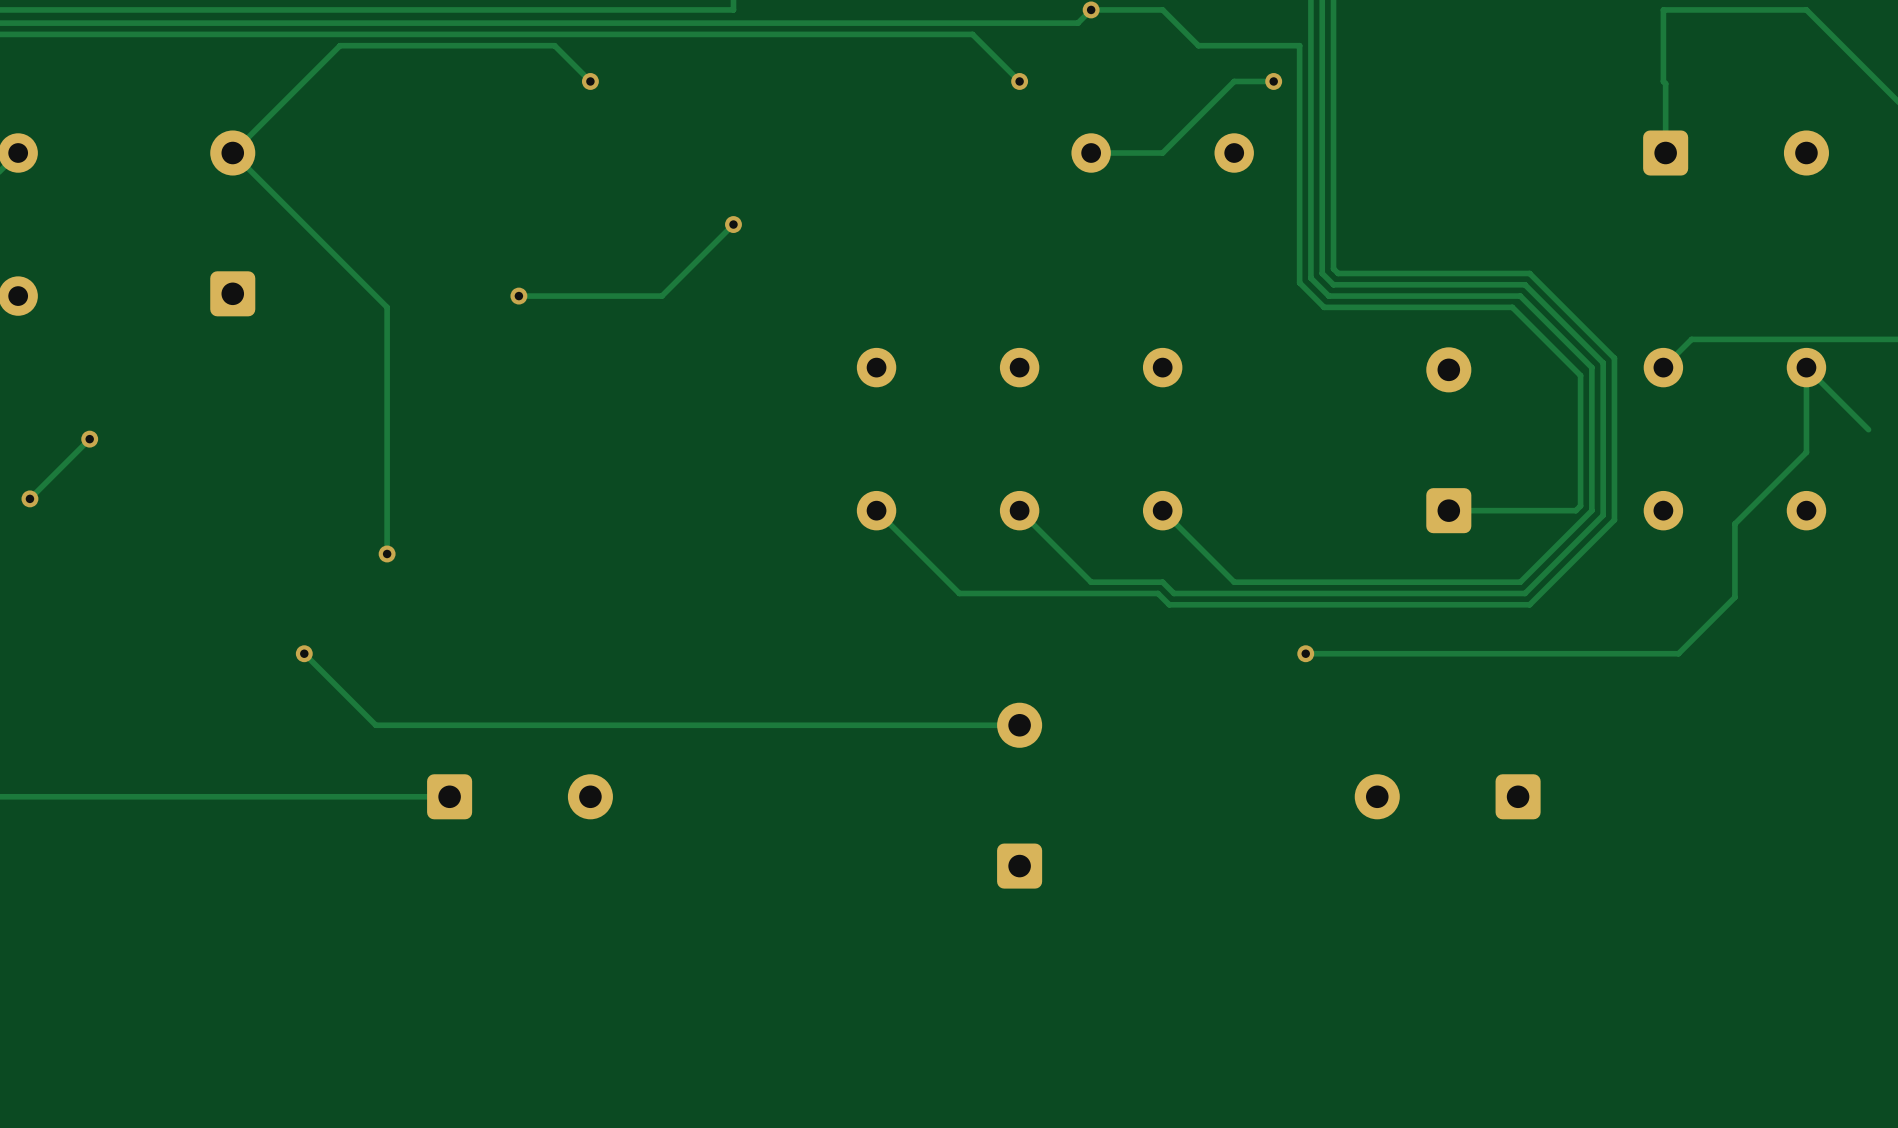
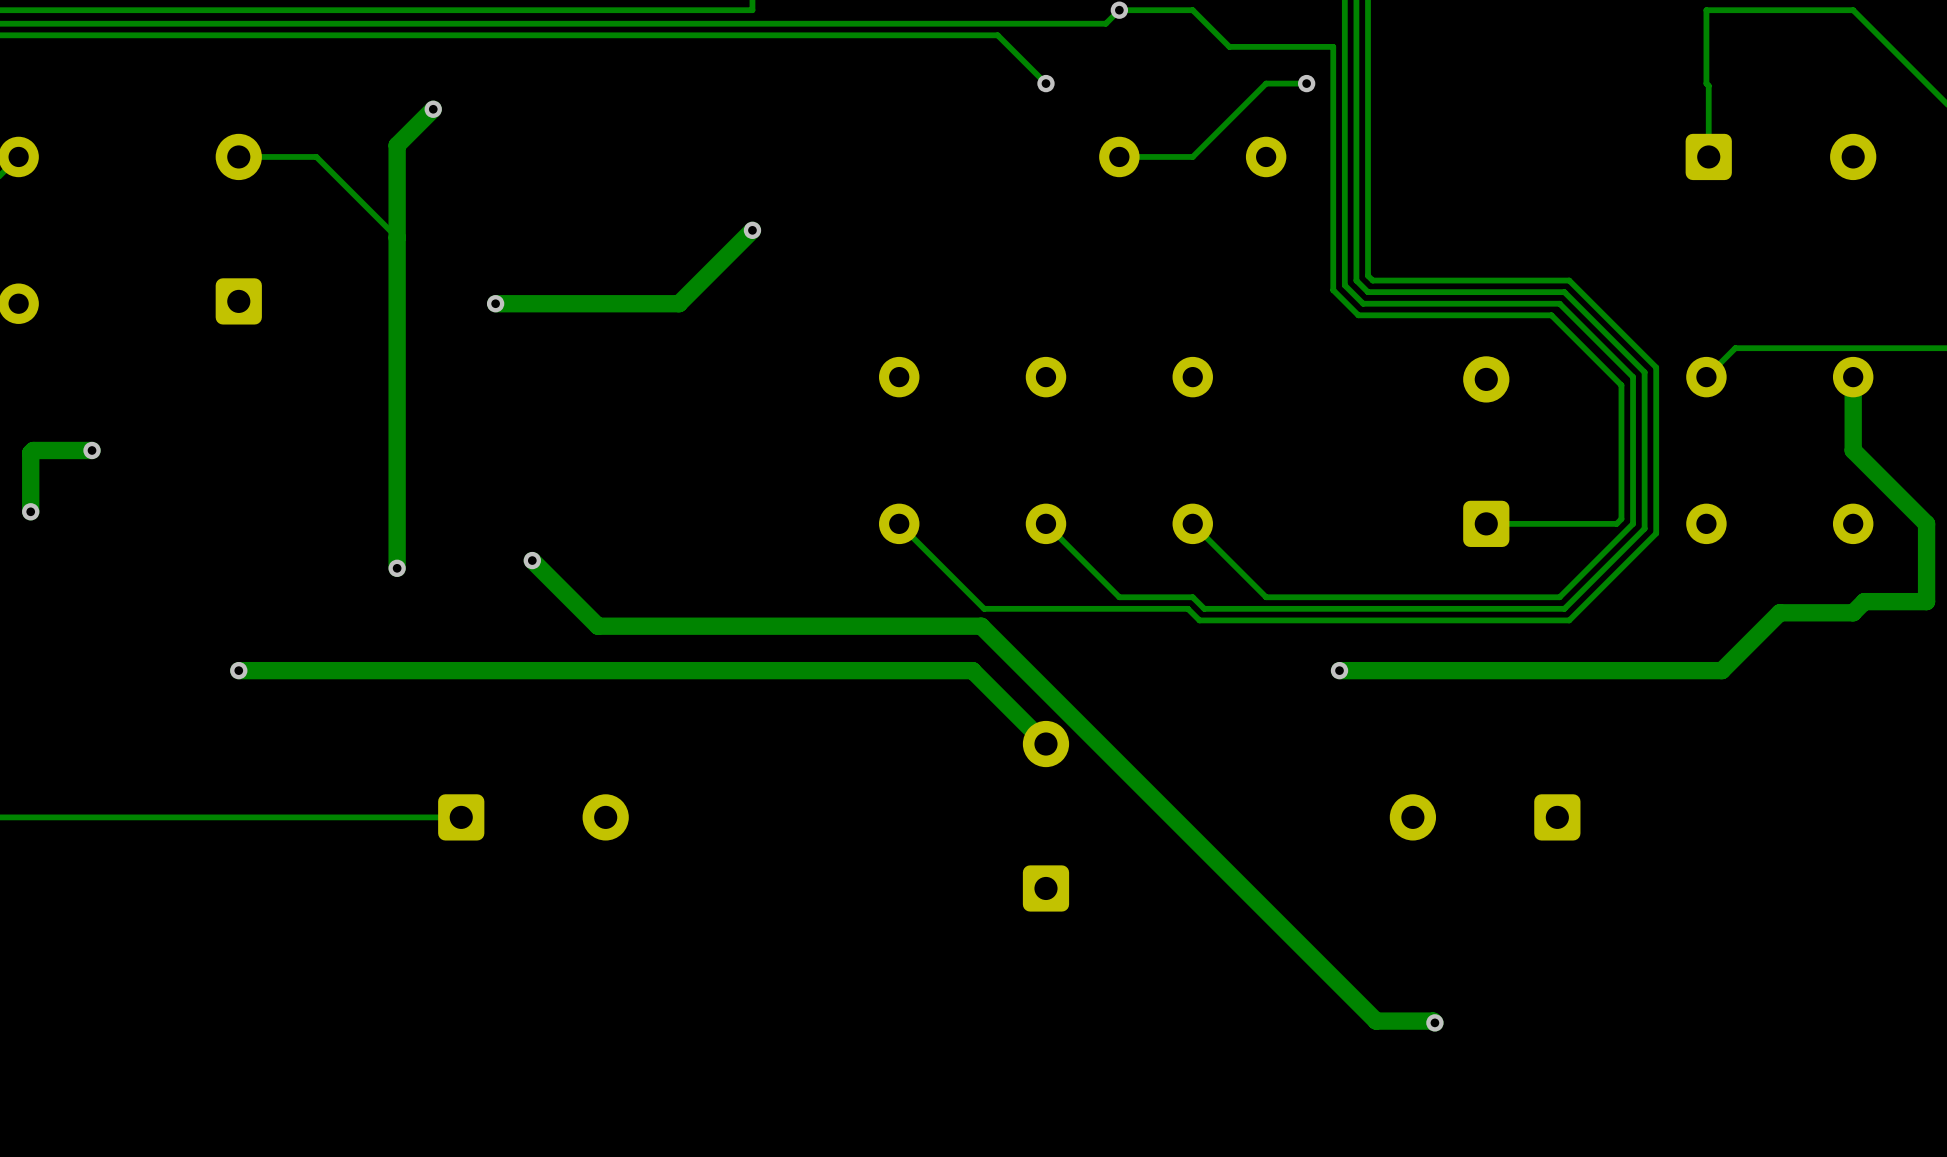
track: (590, 81) (554, 45) (340, 45) (232, 153) (387, 307) -> (433, 109) (397, 145) (397, 315)
via: (590, 81) -> none
via: none -> (433, 109)
track: none -> (238, 156) (316, 156) (397, 237)
track width: thin (733, 224) (661, 296) (518, 296) -> thick (752, 230) (679, 303) (532, 303)
track: none -> (532, 303) (495, 303)
via position: (518, 296) -> (495, 303)
track width: thin (387, 307) (387, 553) -> thick (397, 315) (397, 568)
track: (1806, 367) (1868, 429) -> none
track width: thin (1806, 367) (1806, 439) -> thick (1853, 377) (1853, 450)
track: (89, 439) (29, 498) -> (92, 450) (33, 450) (30, 453) (30, 511)
track: (1806, 439) (1806, 452) (1734, 523) (1734, 597) -> (1853, 450) (1926, 523) (1926, 601) (1864, 601) (1853, 612) (1779, 612)
track: none -> (532, 560) (597, 626) (981, 626) (1376, 1021) (1433, 1021) (1434, 1022)
via: none -> (532, 560)
track width: thin (1734, 597) (1678, 653) (1305, 653) -> thick (1779, 612) (1721, 670) (1339, 670)
track: (304, 653) (375, 725) (1019, 725) -> (238, 670) (972, 670) (1045, 744)
via position: (304, 653) -> (238, 670)
via: none -> (1434, 1022)

